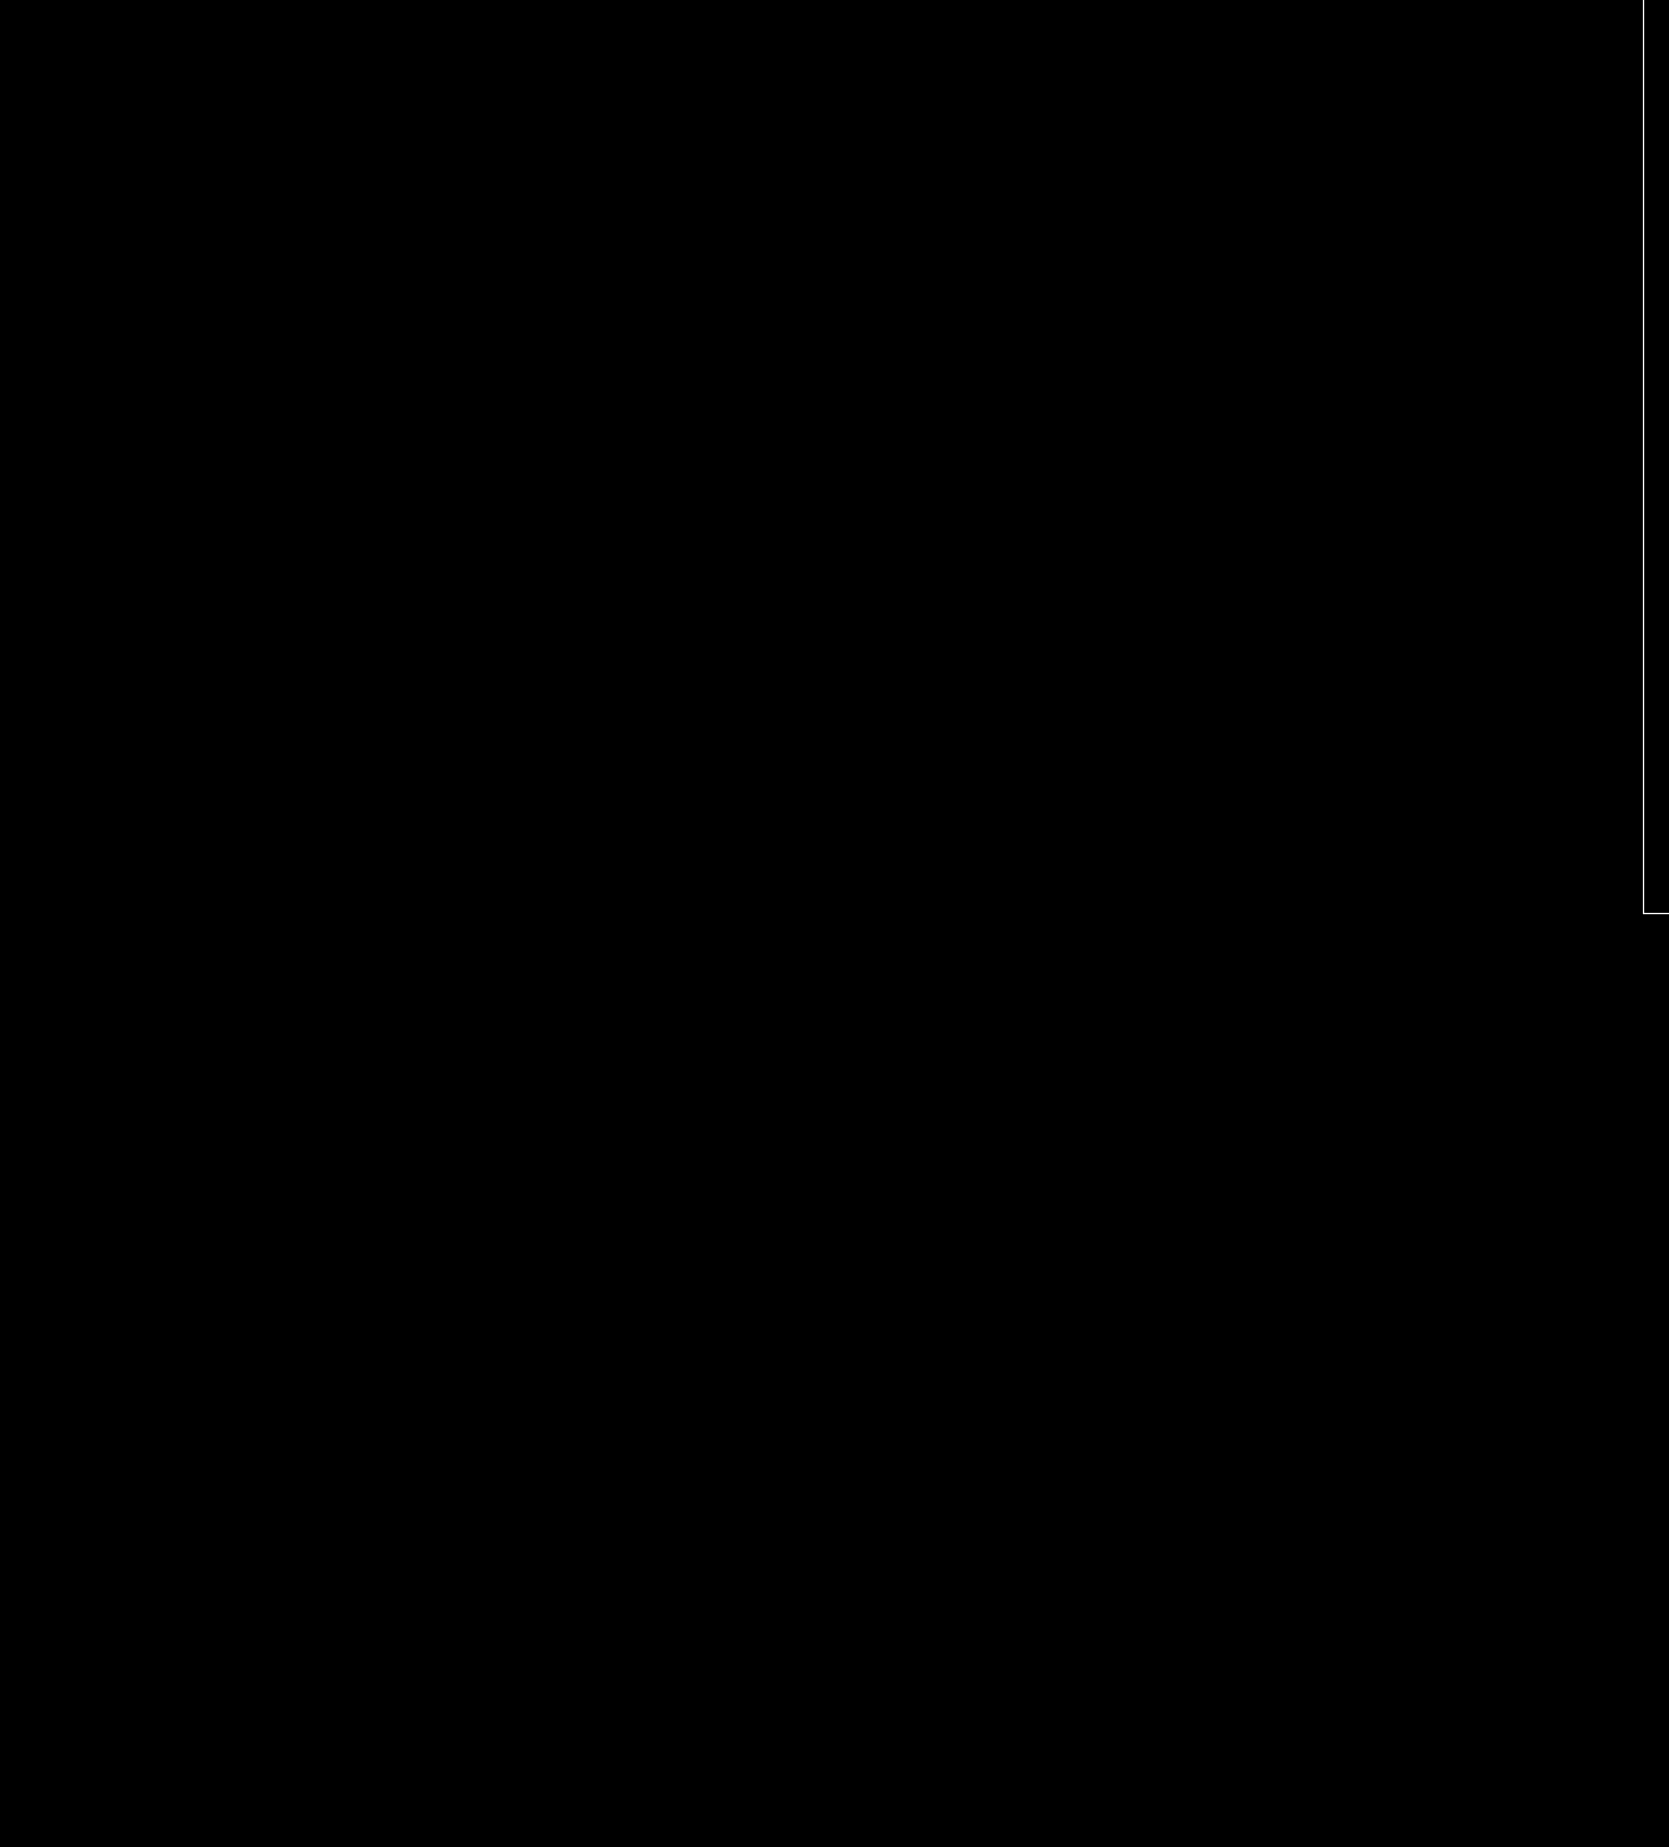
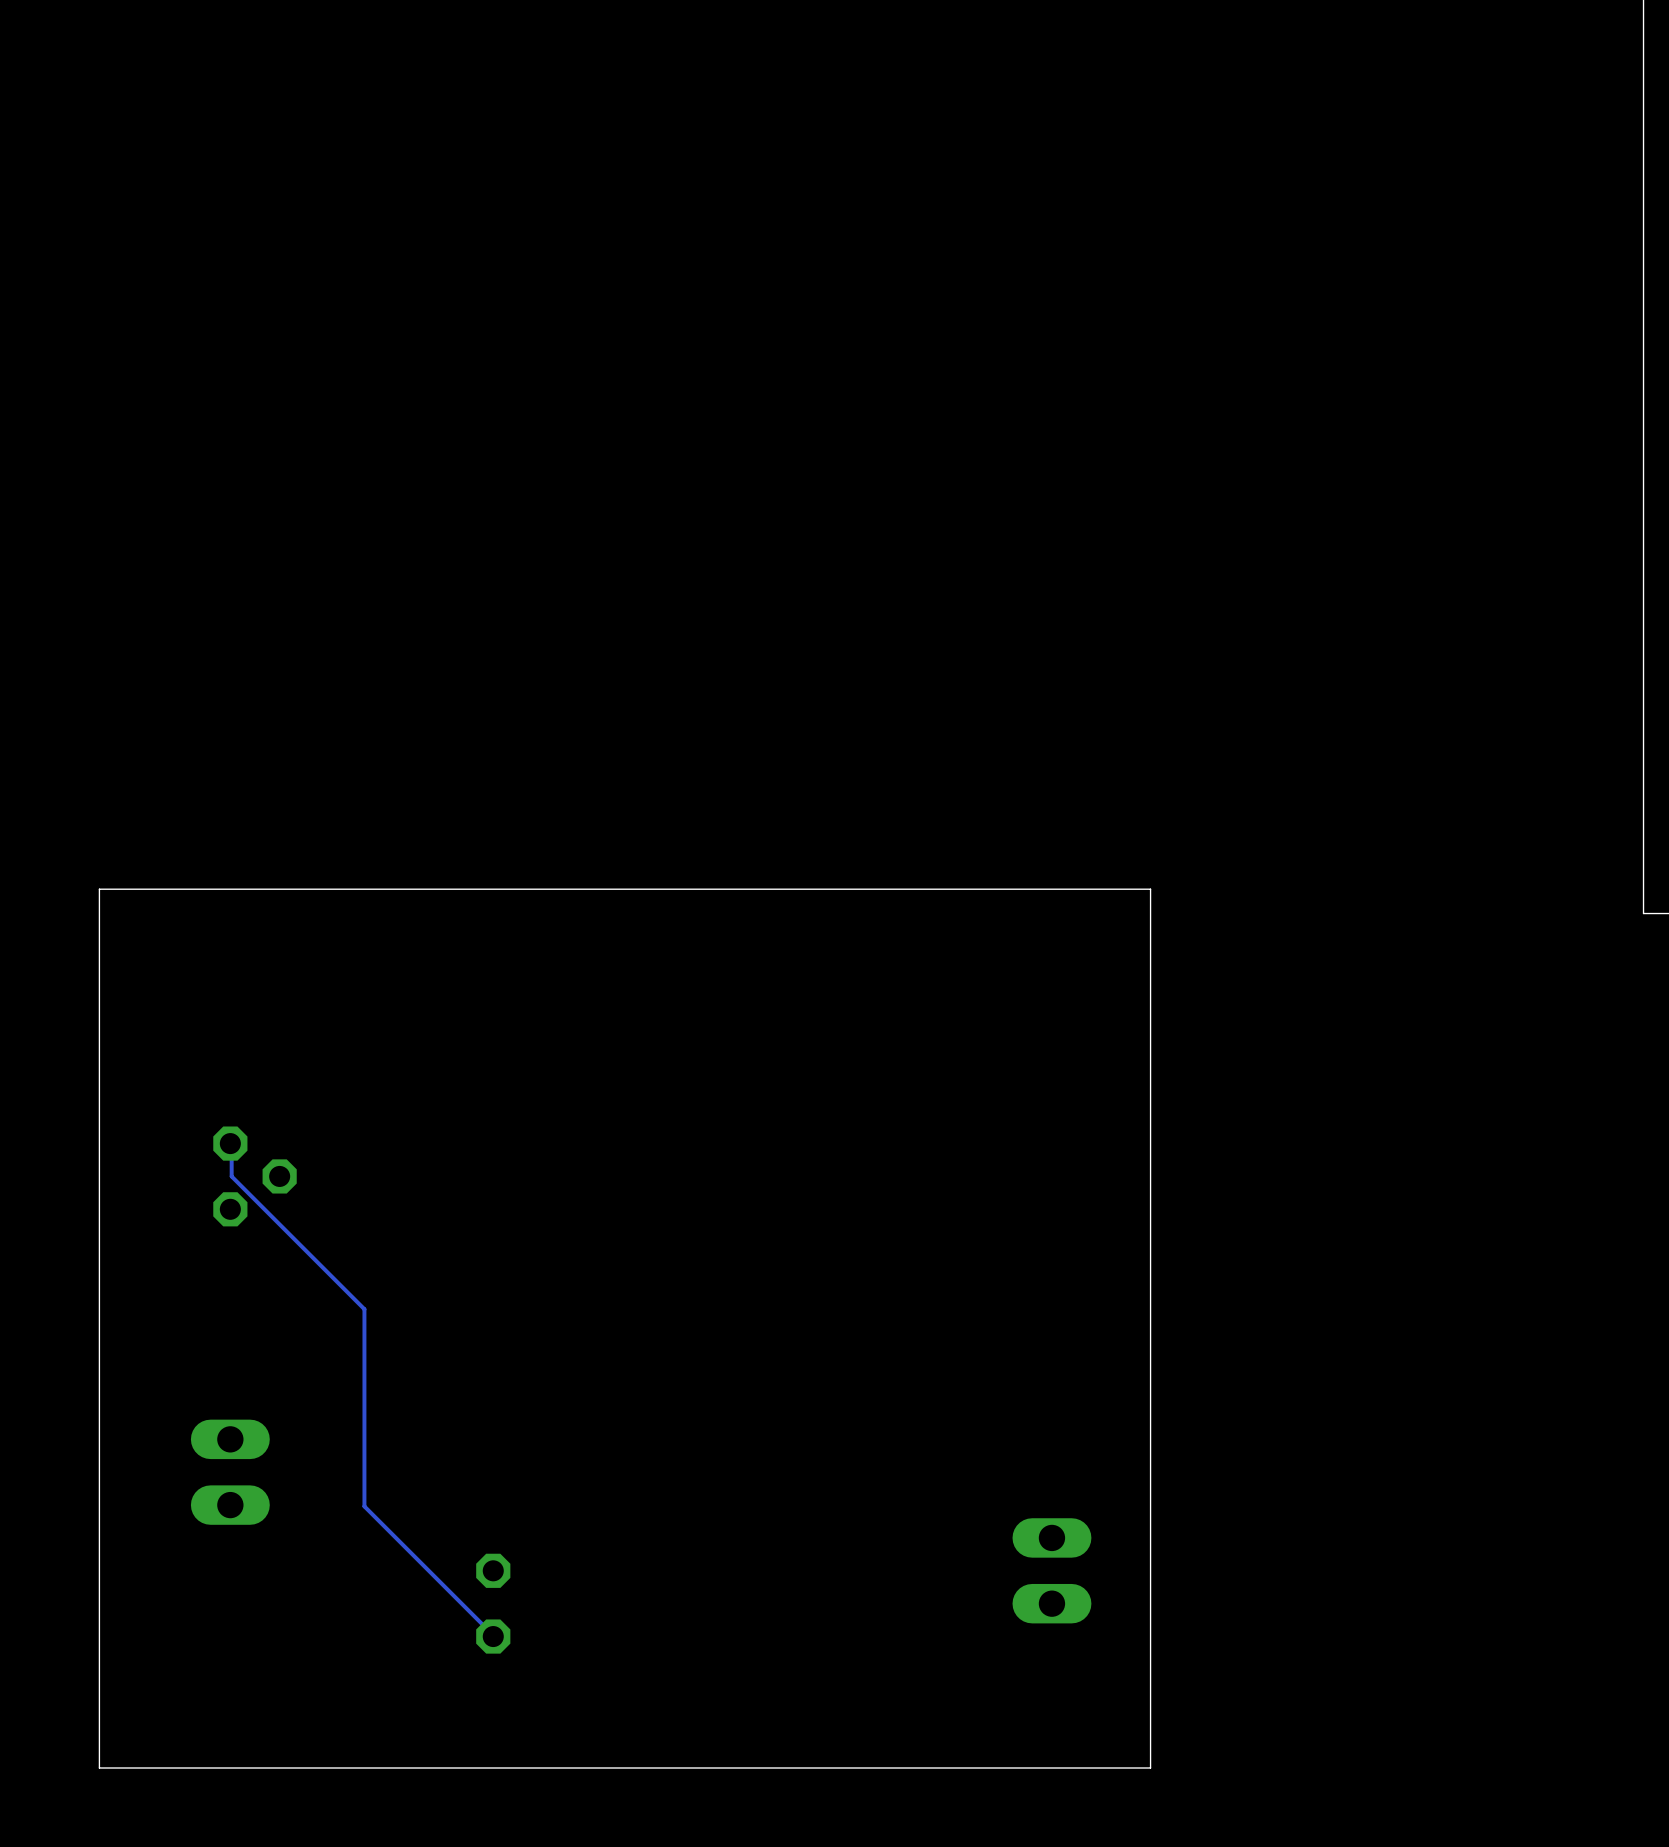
board edge: none -> (1150, 889) (99, 889) (99, 1768) (1150, 1768) (1150, 889)
track: none -> (230, 1143) (231, 1176) (364, 1309) (364, 1506) (493, 1636)
part: none -> (255, 1176)
part: none -> (230, 1472)
part: none -> (1051, 1570)
part: none -> (493, 1603)

